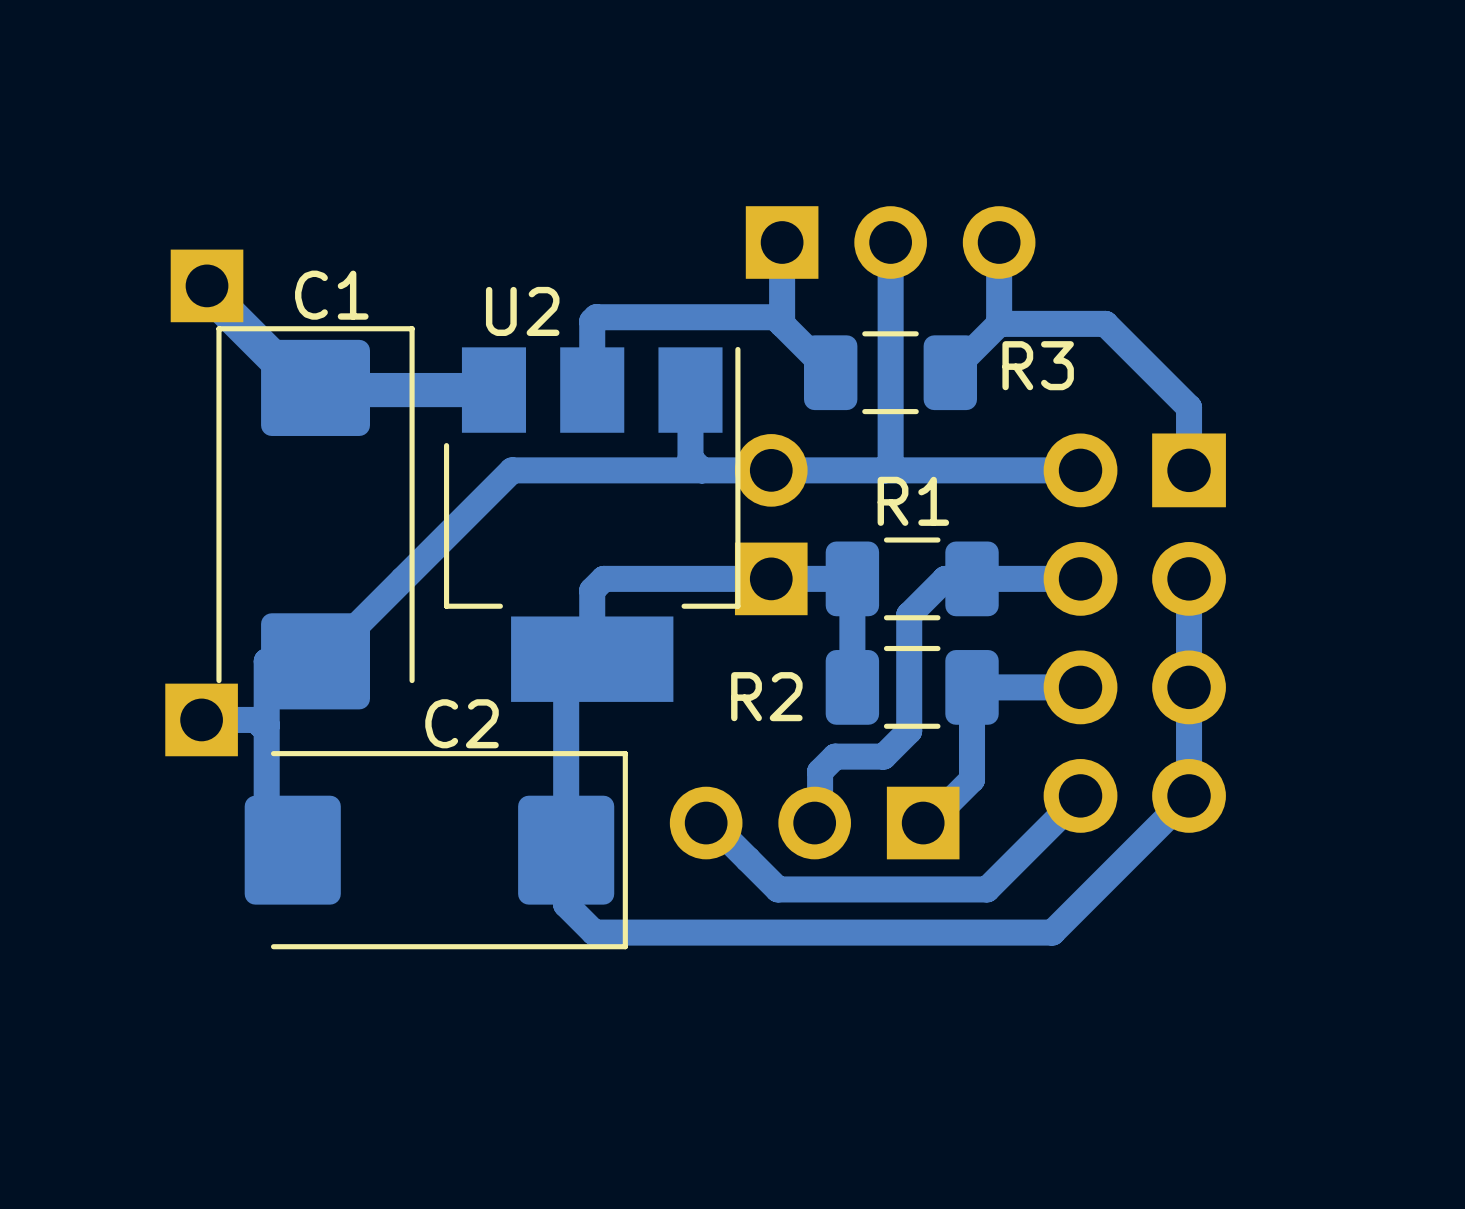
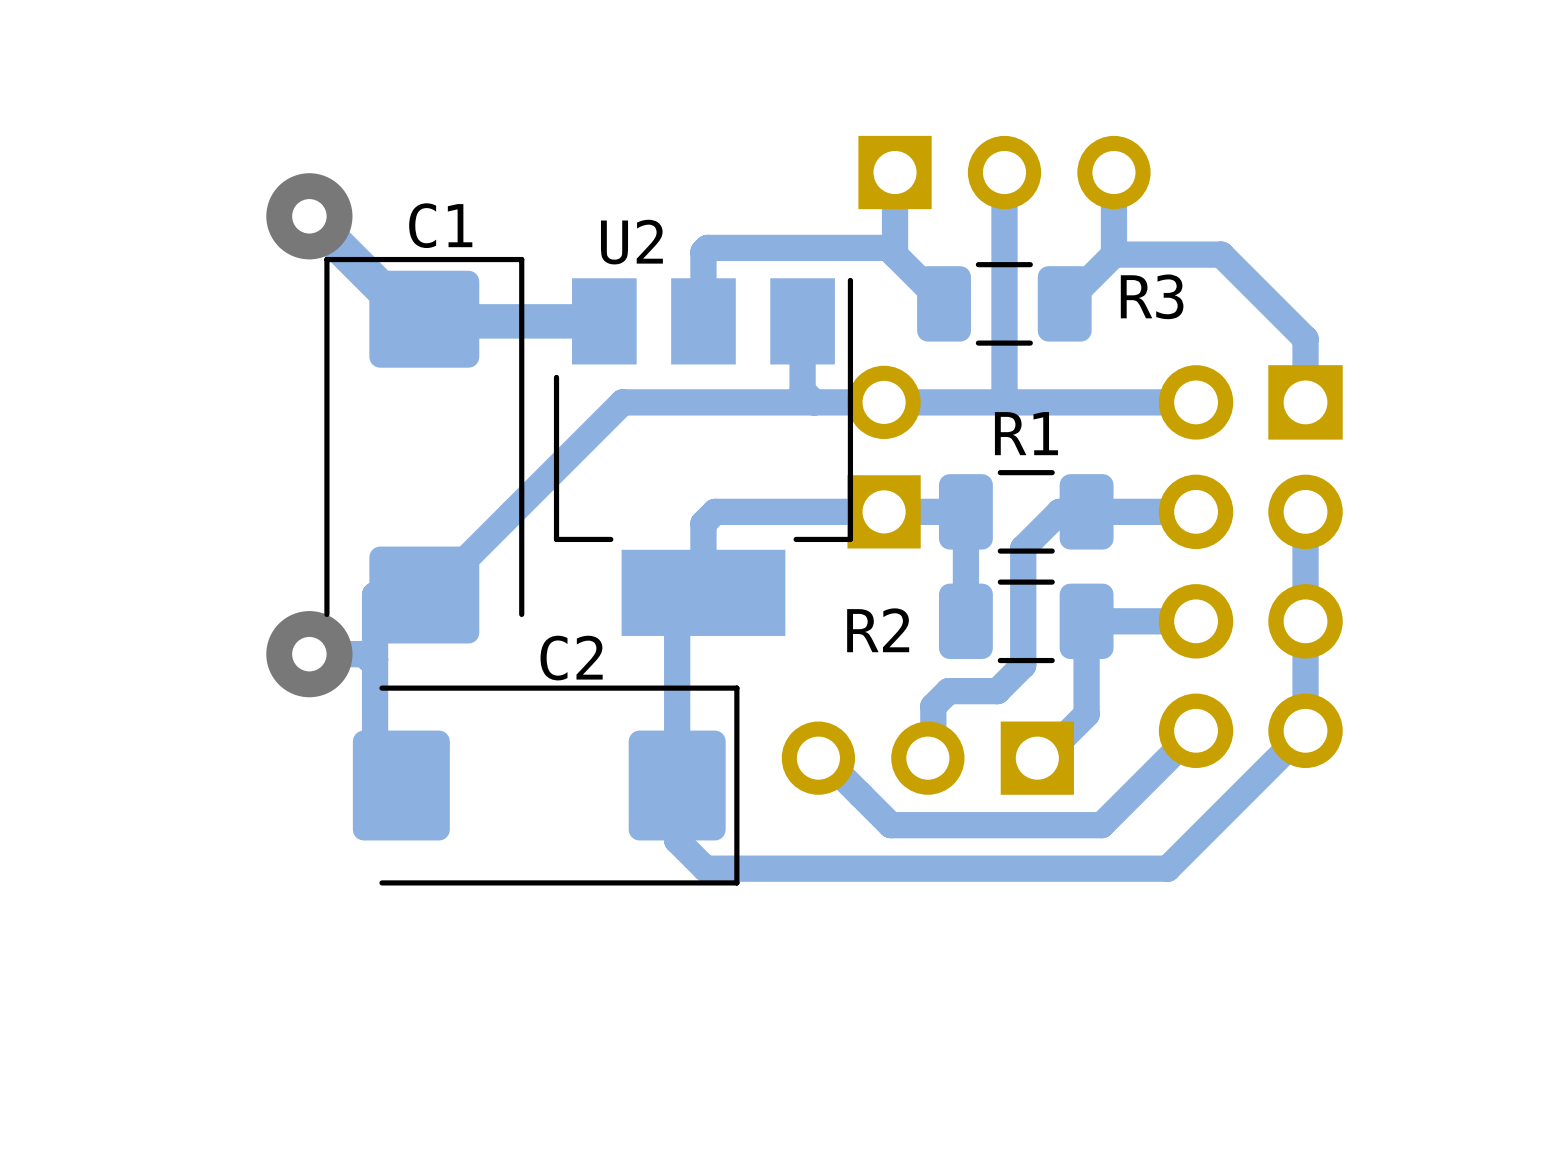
via: none -> (309, 216)
part: (207, 285) -> none
part: (201, 719) -> none
via: none -> (309, 654)

